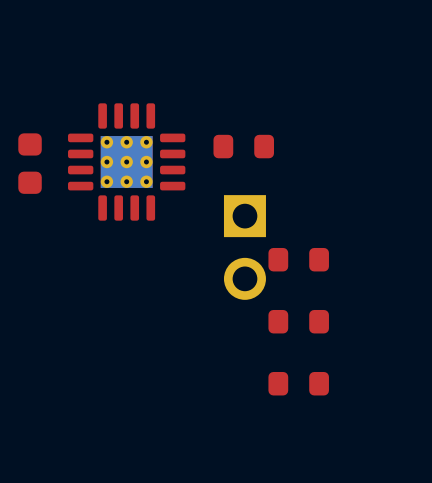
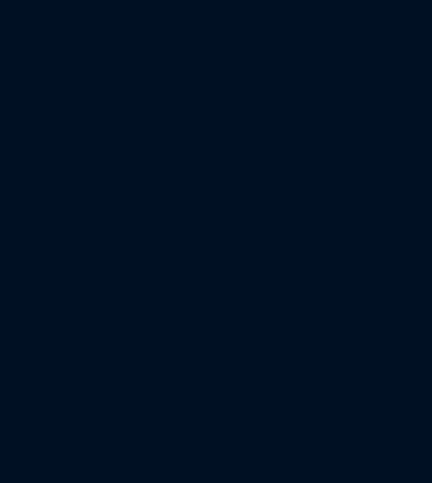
part: (243, 146) -> none
part: (126, 162) -> none
part: (30, 163) -> none
part: (244, 247) -> none
part: (298, 259) -> none
part: (298, 321) -> none
part: (298, 383) -> none

